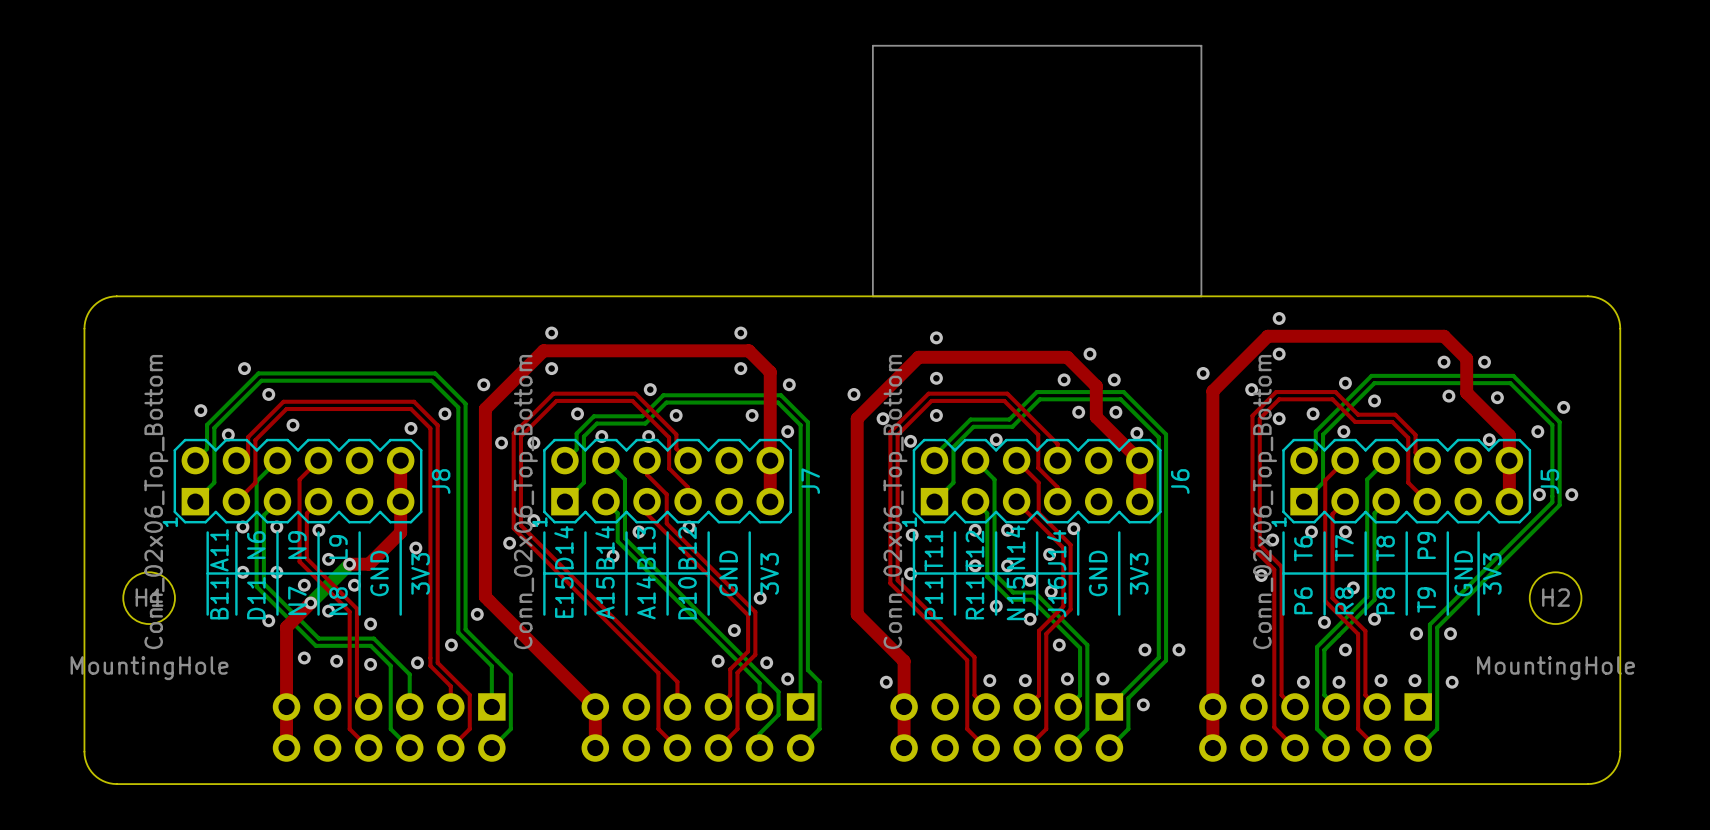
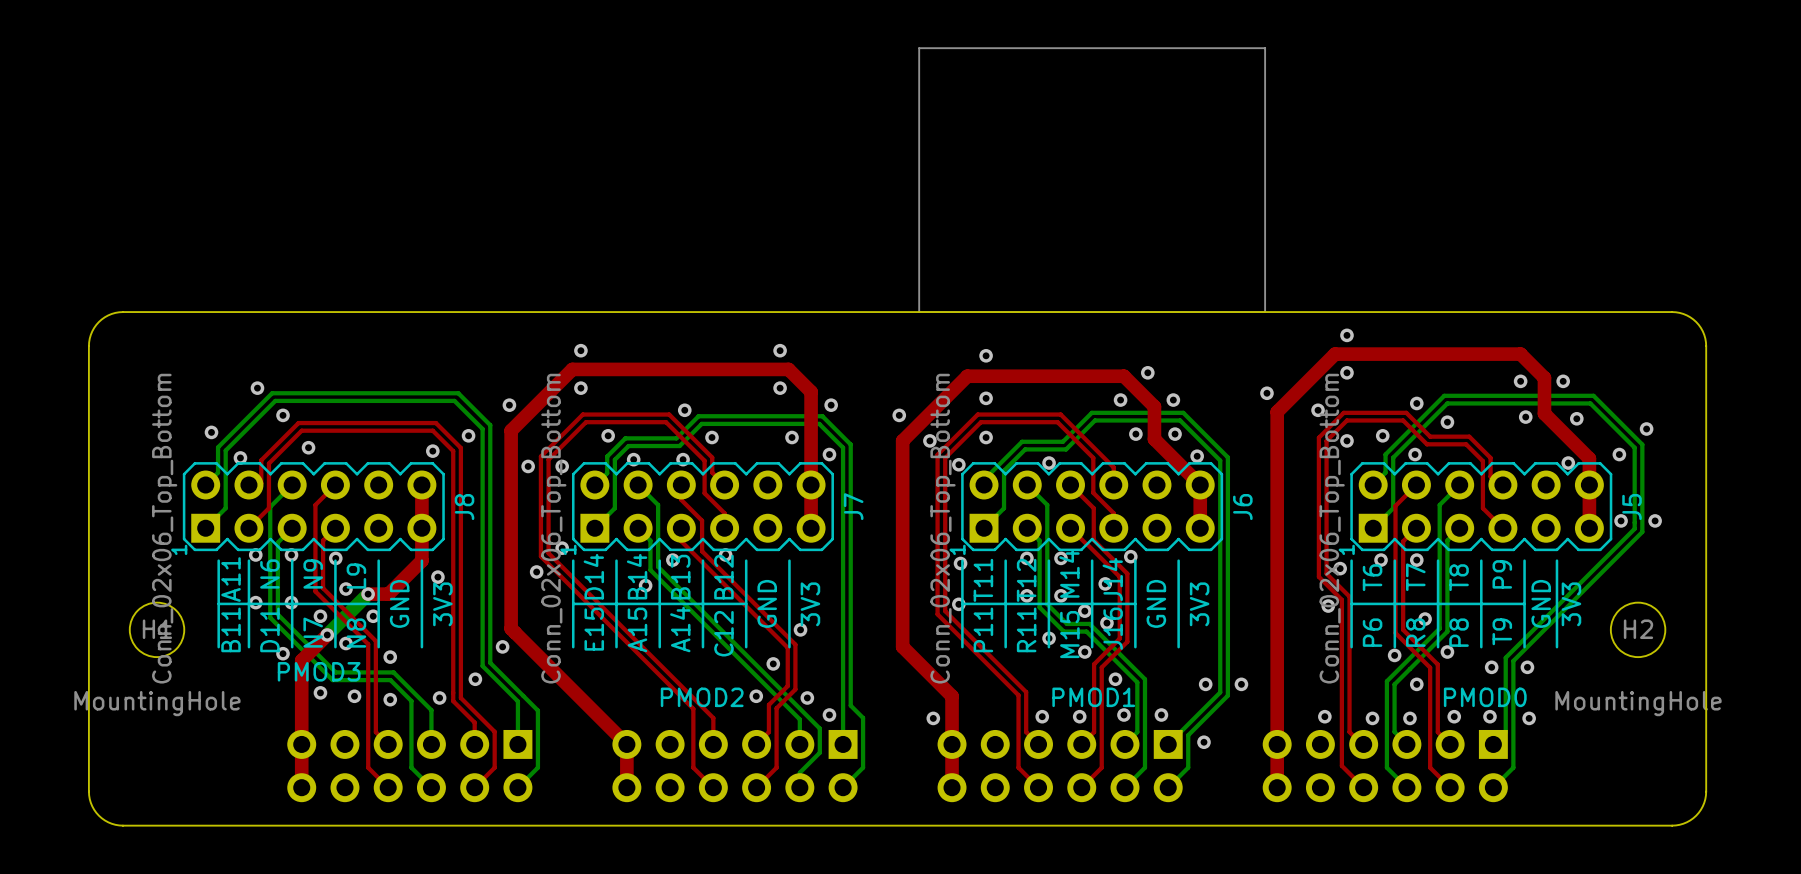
text: N14 (1015, 547) -> M14 (1069, 573)
text: D10 (687, 598) -> C12 (723, 633)
text: N15 (1016, 598) -> M15 (1069, 634)
text: none -> PMOD3 (319, 671)
text: none -> PMOD2 (702, 697)
text: none -> PMOD1 (1093, 697)
text: none -> PMOD0 (1485, 697)

